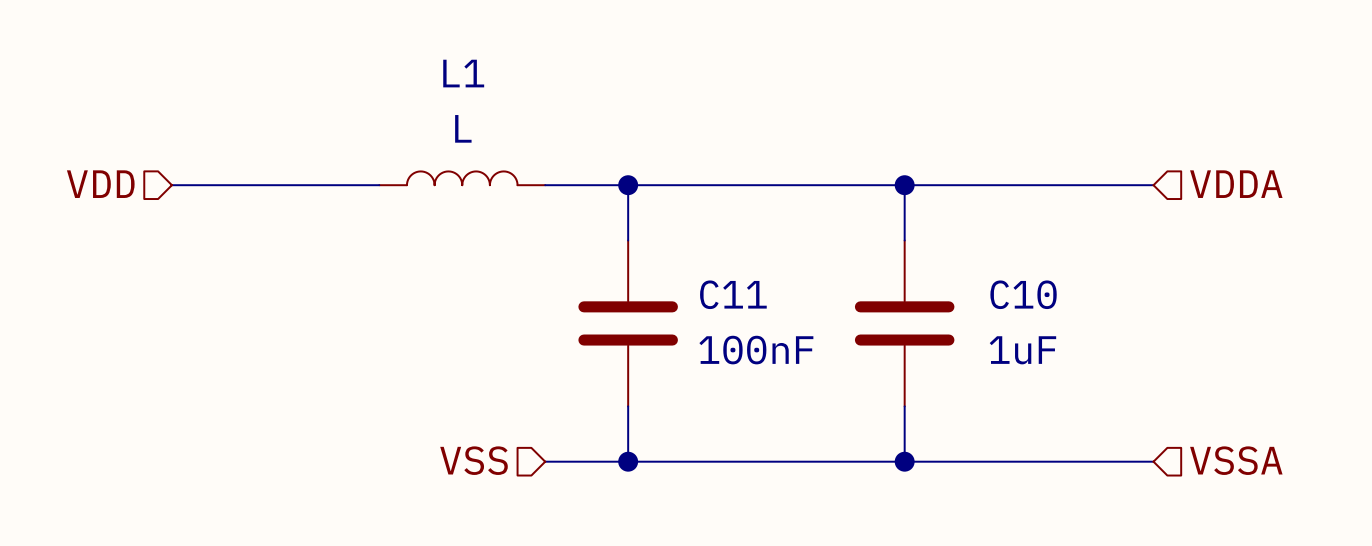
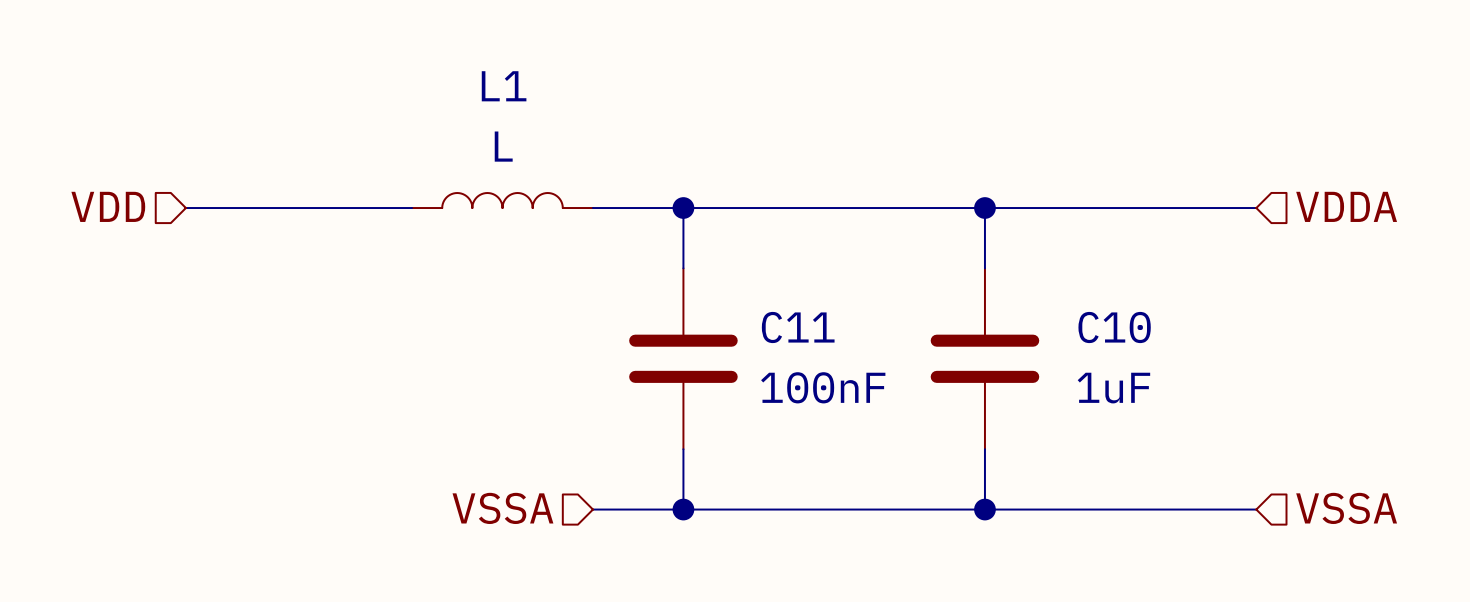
hierarchical label: VSS (474, 460) -> VSSA (502, 508)

